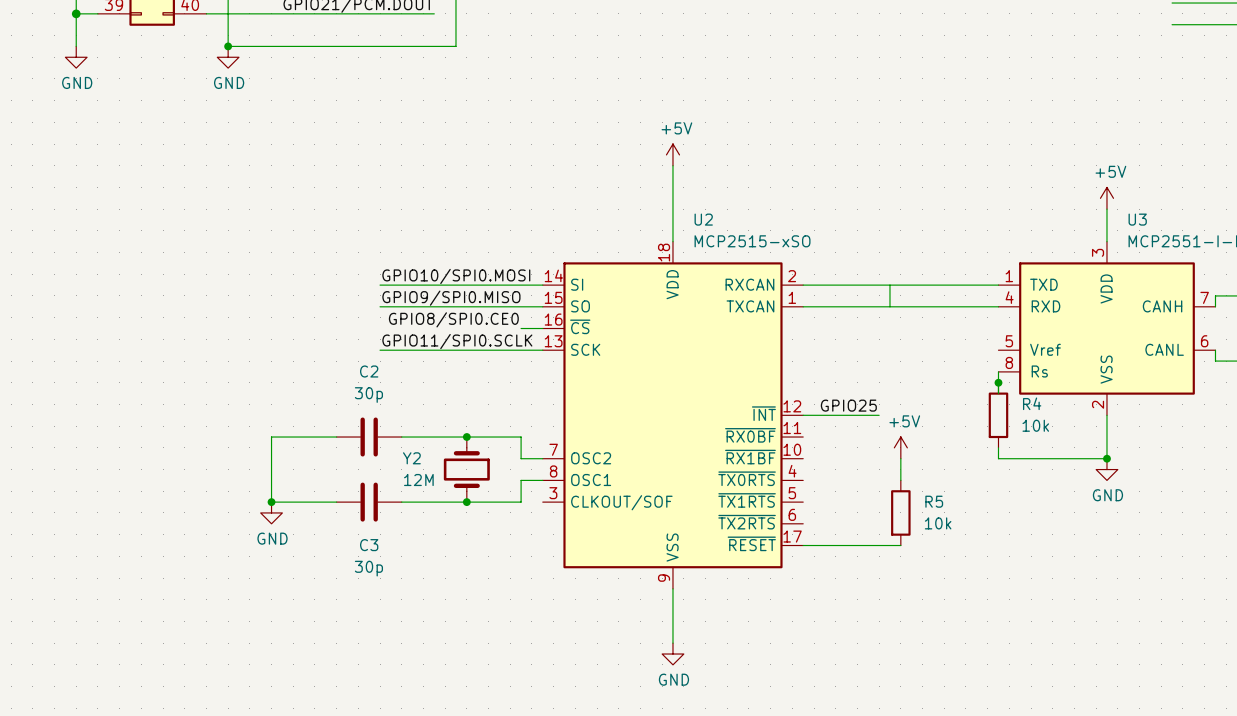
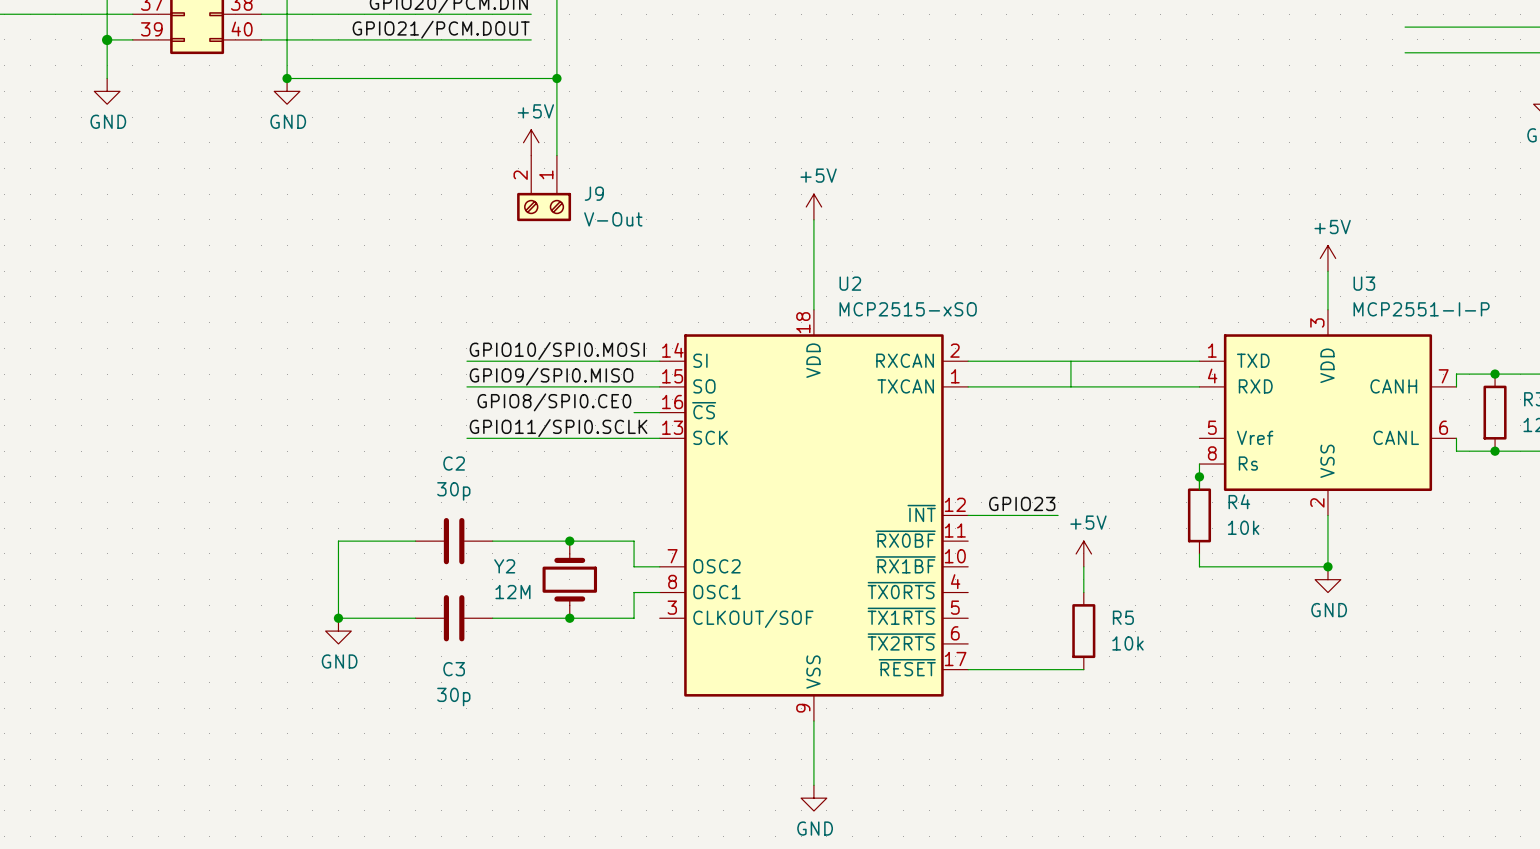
wire: none -> (556, 78) (556, 155)
junction: none -> (556, 78)
power symbol: none -> +5V (531, 142)
J9: none -> V-Out (544, 188)
label: GPIO25 (848, 405) -> GPIO23 (1022, 503)

